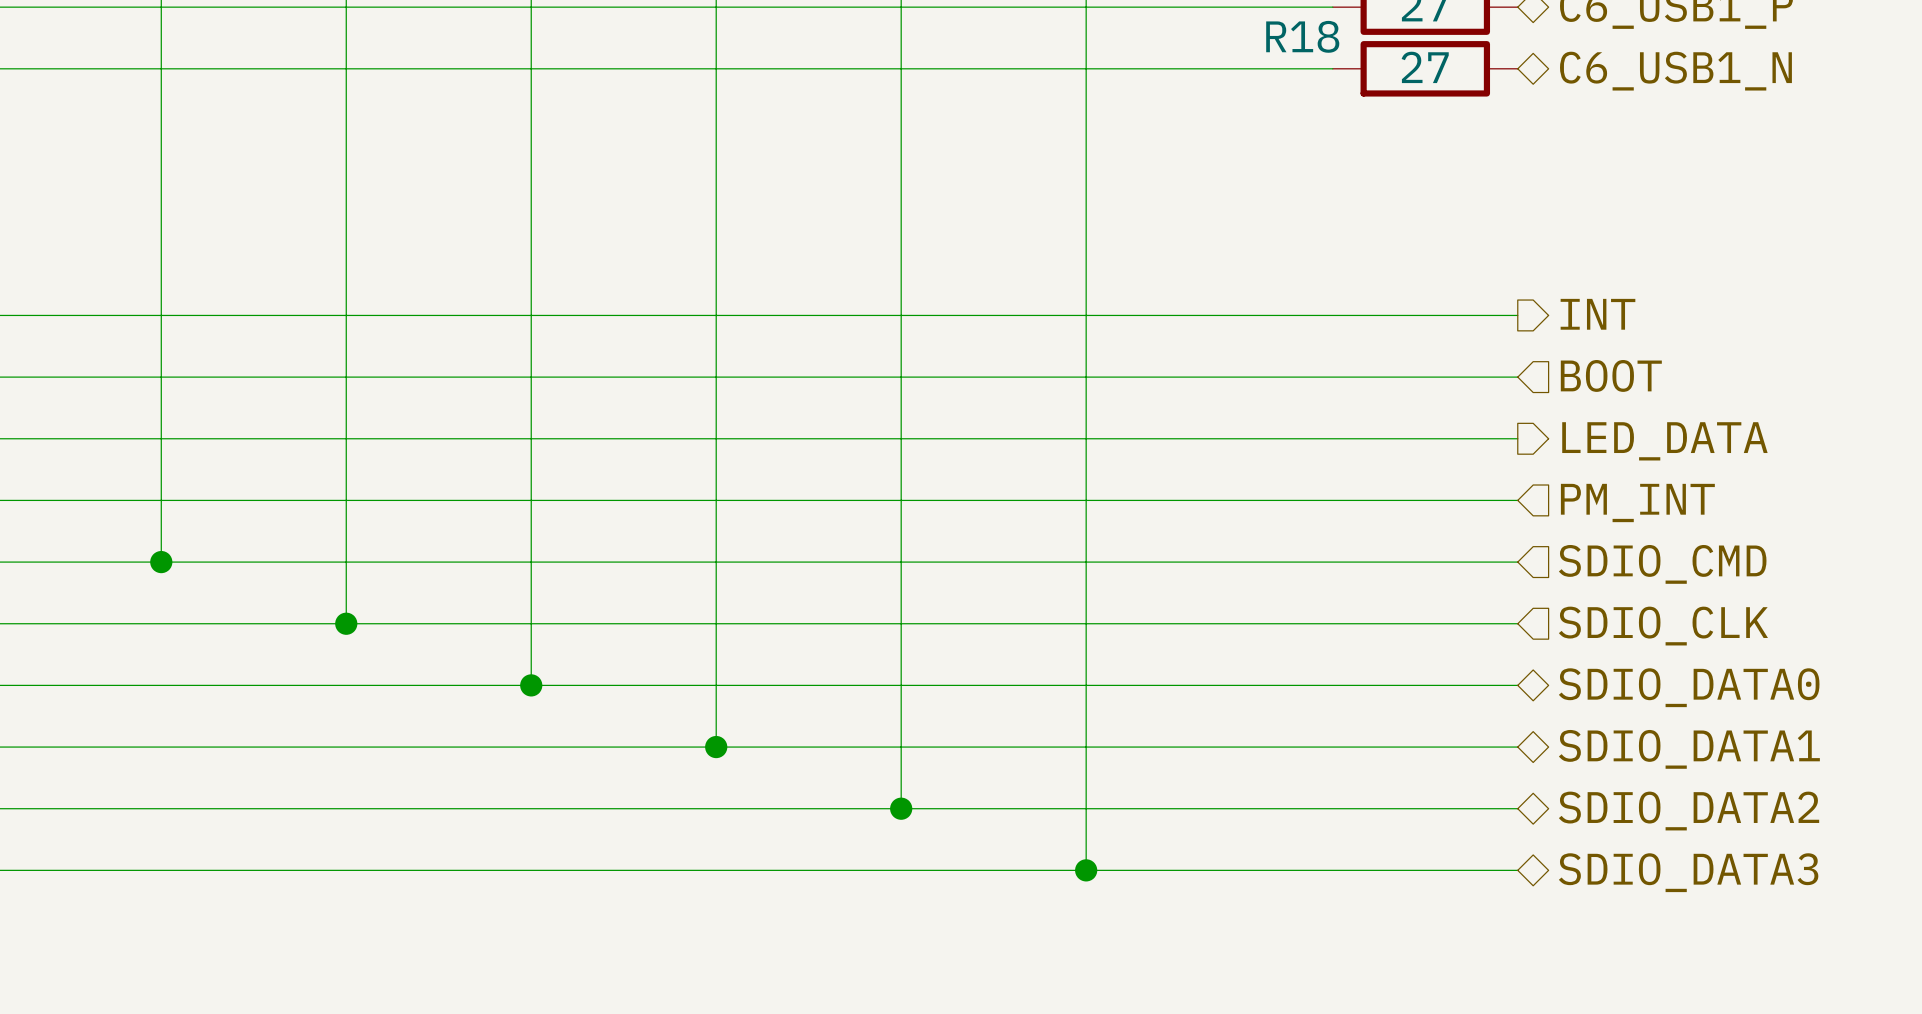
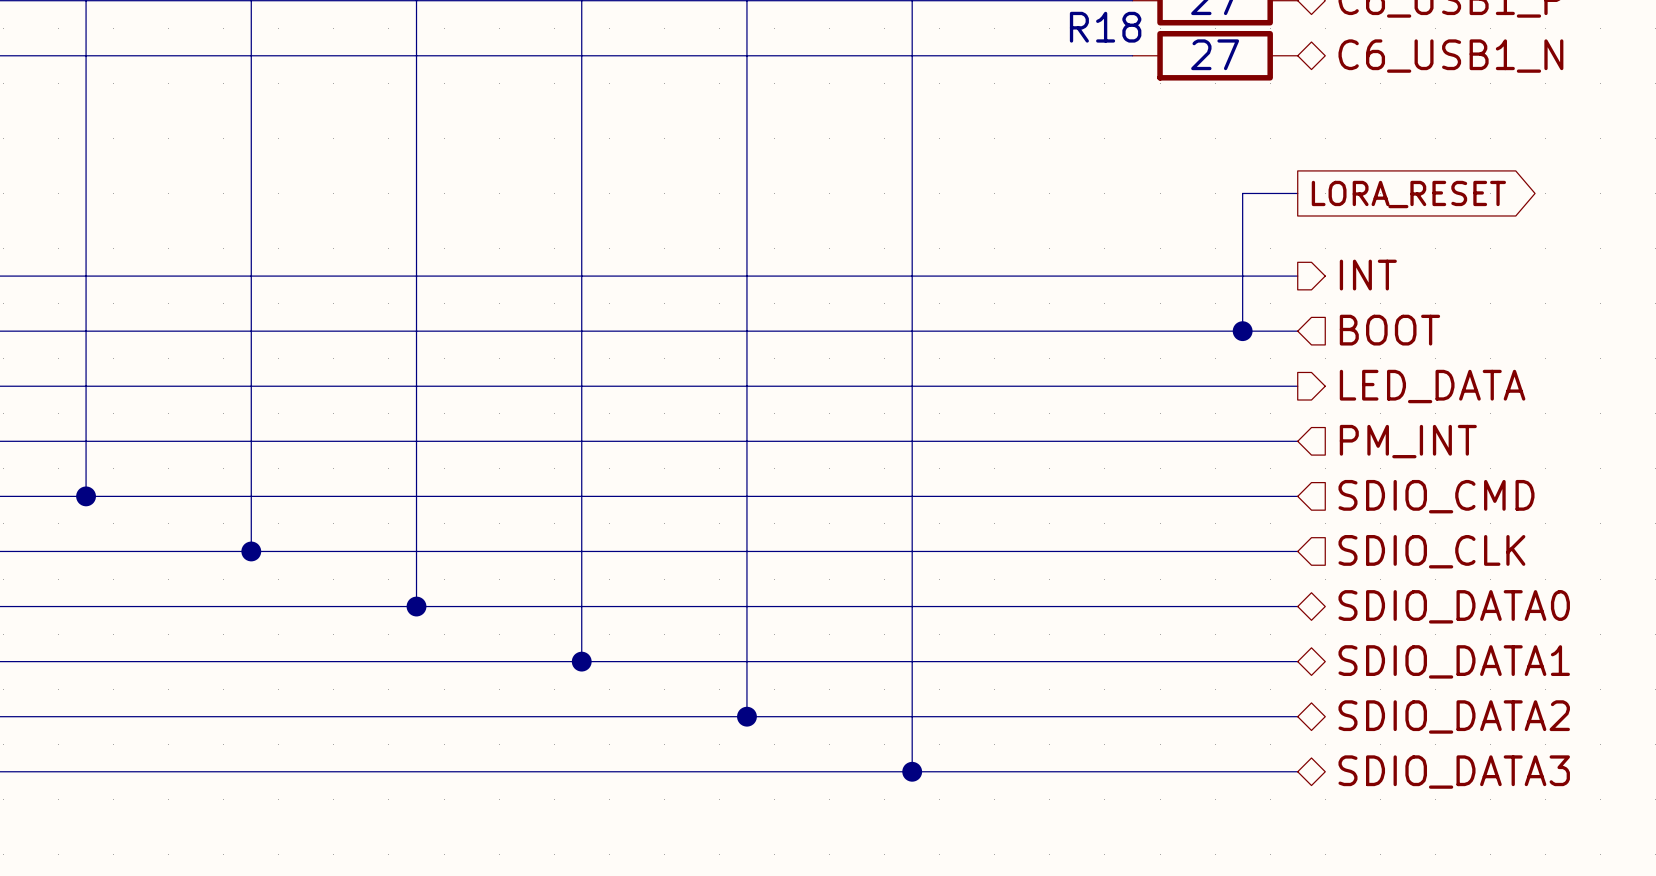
wire: none -> (1297, 193) (1242, 193) (1242, 331)
global label: none -> LORA_RESET (1408, 194)
junction: none -> (1242, 331)

